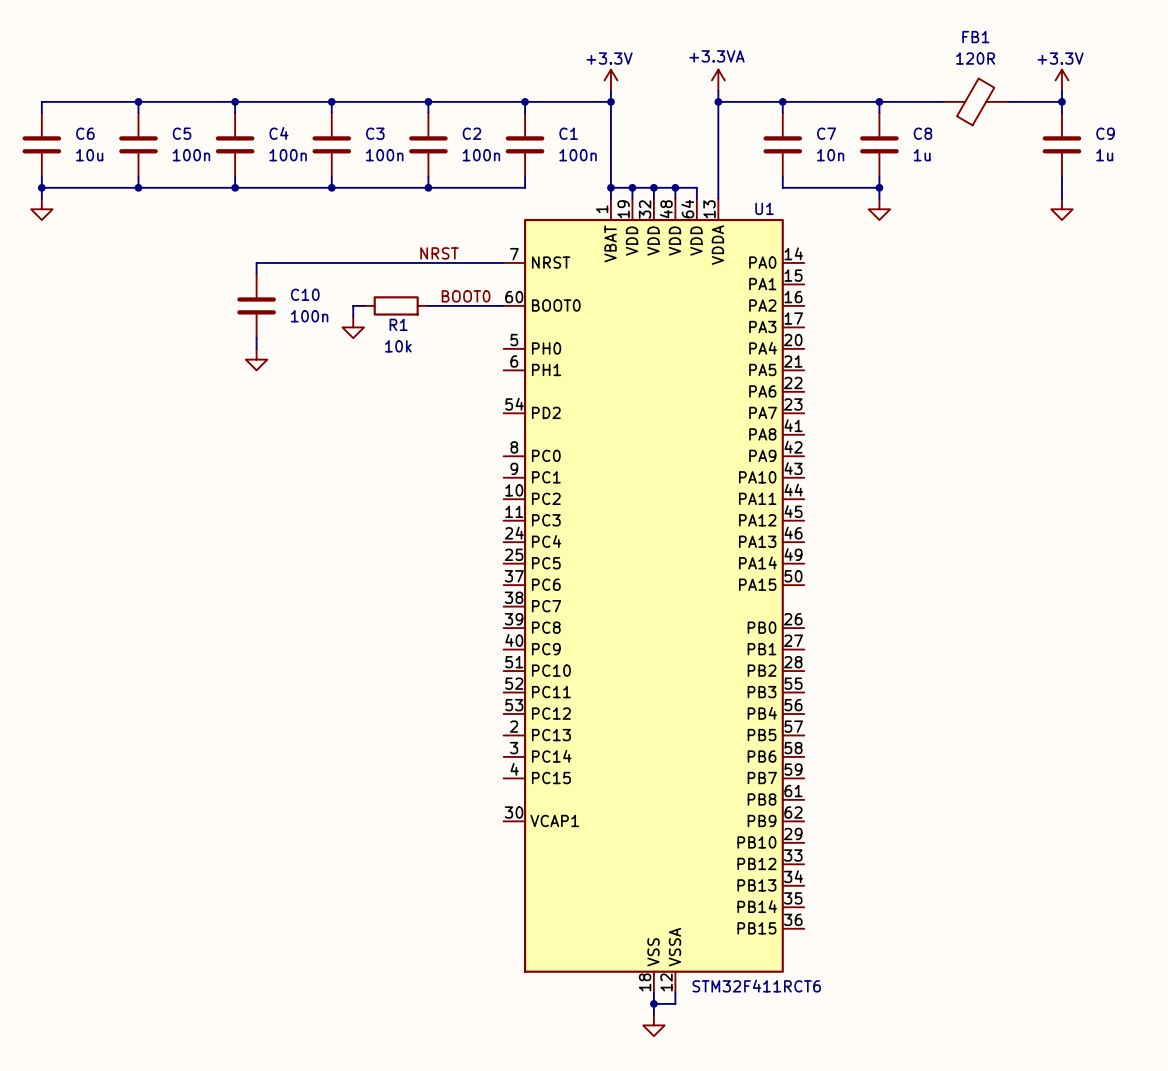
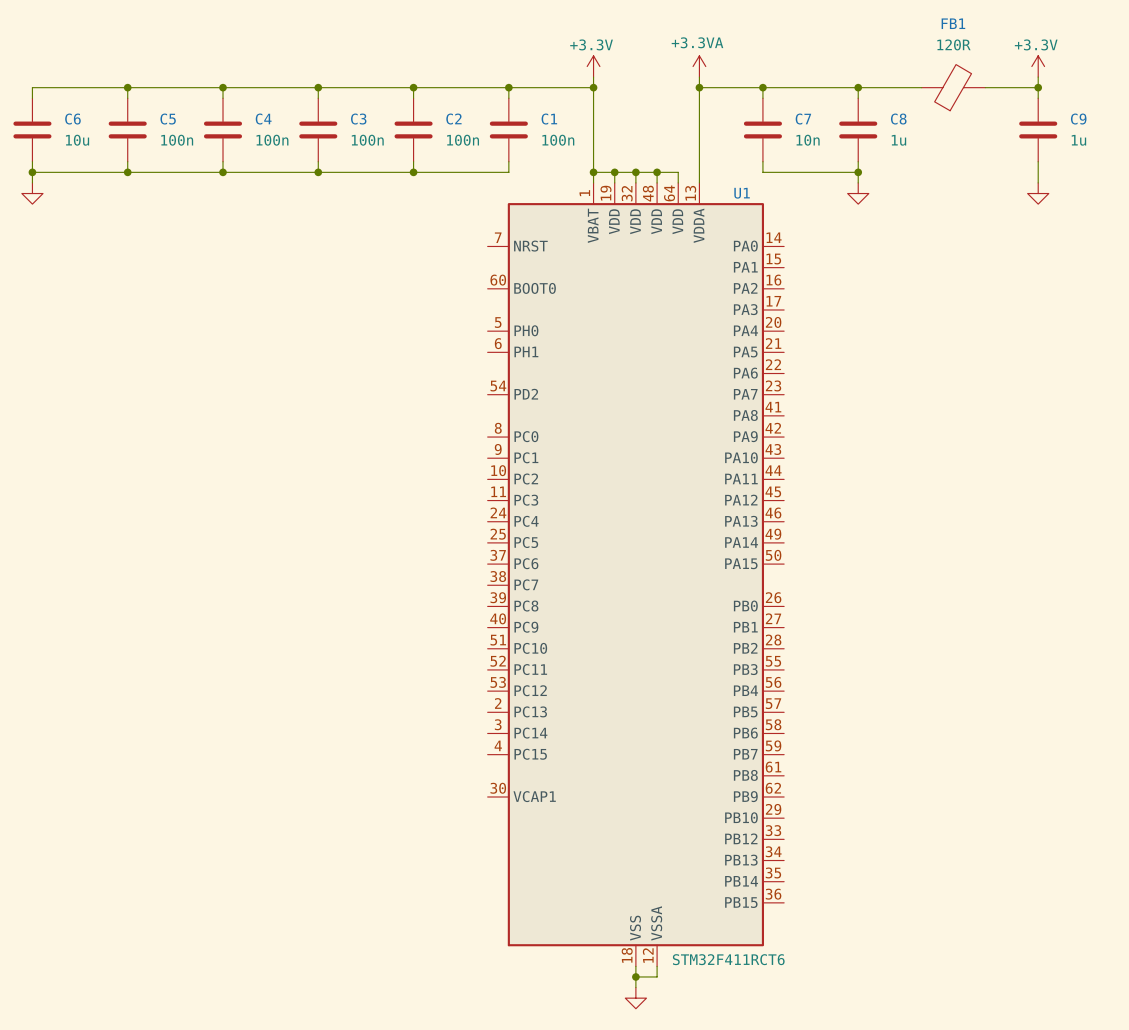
label: NRST (439, 253) -> none
wire: (503, 262) (256, 262) (256, 273) -> none
label: BOOT0 (466, 296) -> none
C10: 100n (256, 305) -> none
wire: (363, 305) (353, 305) (353, 316) -> none
R1: 10k (396, 305) -> none
wire: (428, 305) (503, 305) -> none
power symbol: (353, 327) -> none
wire: (256, 338) (256, 348) -> none
power symbol: (256, 359) -> none

